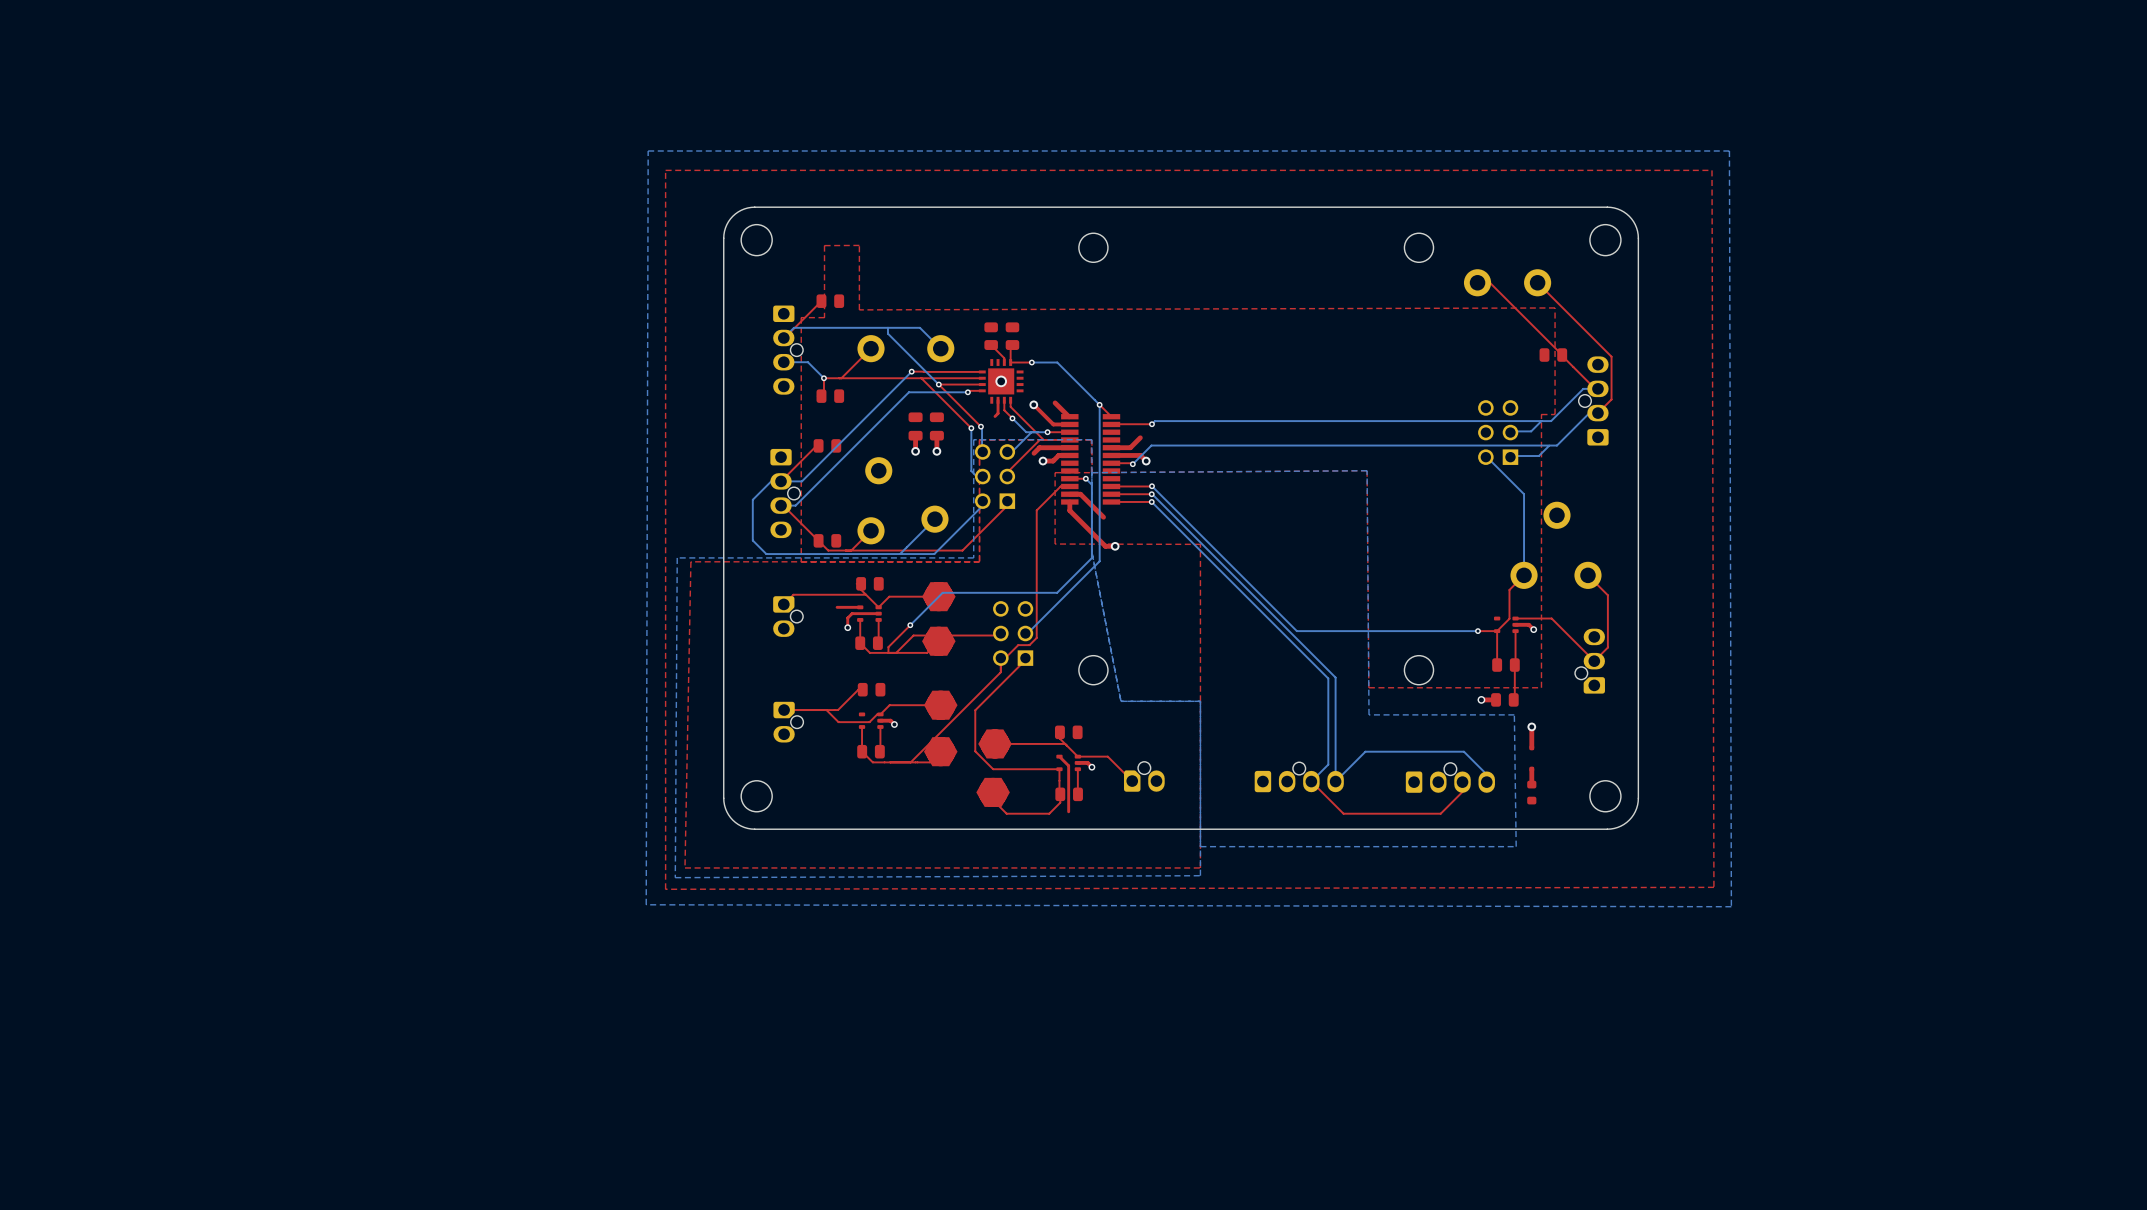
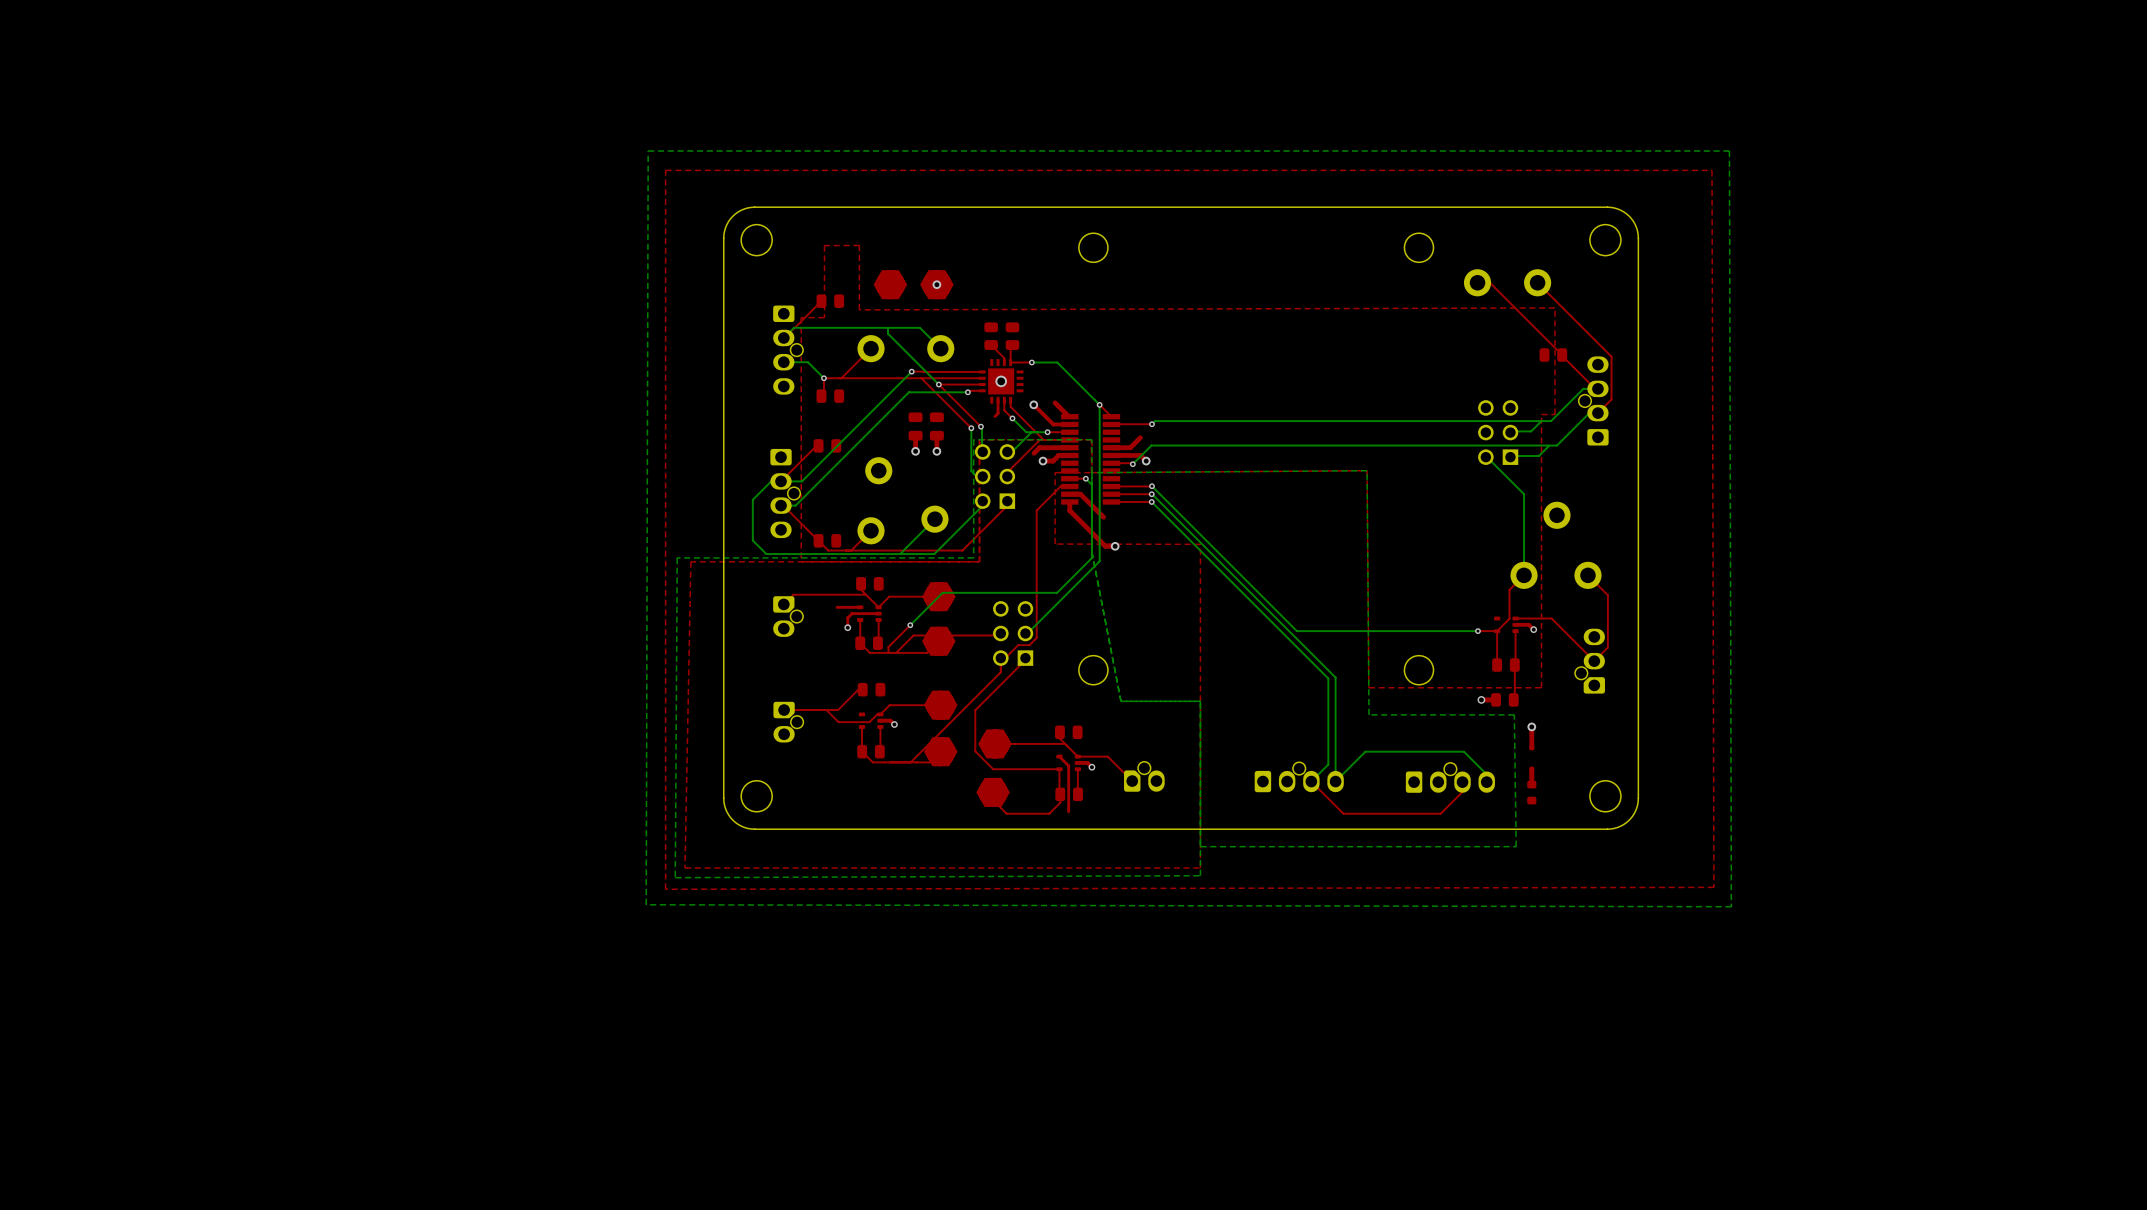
part: none -> (890, 284)
part: none -> (936, 284)
via: none -> (936, 284)

